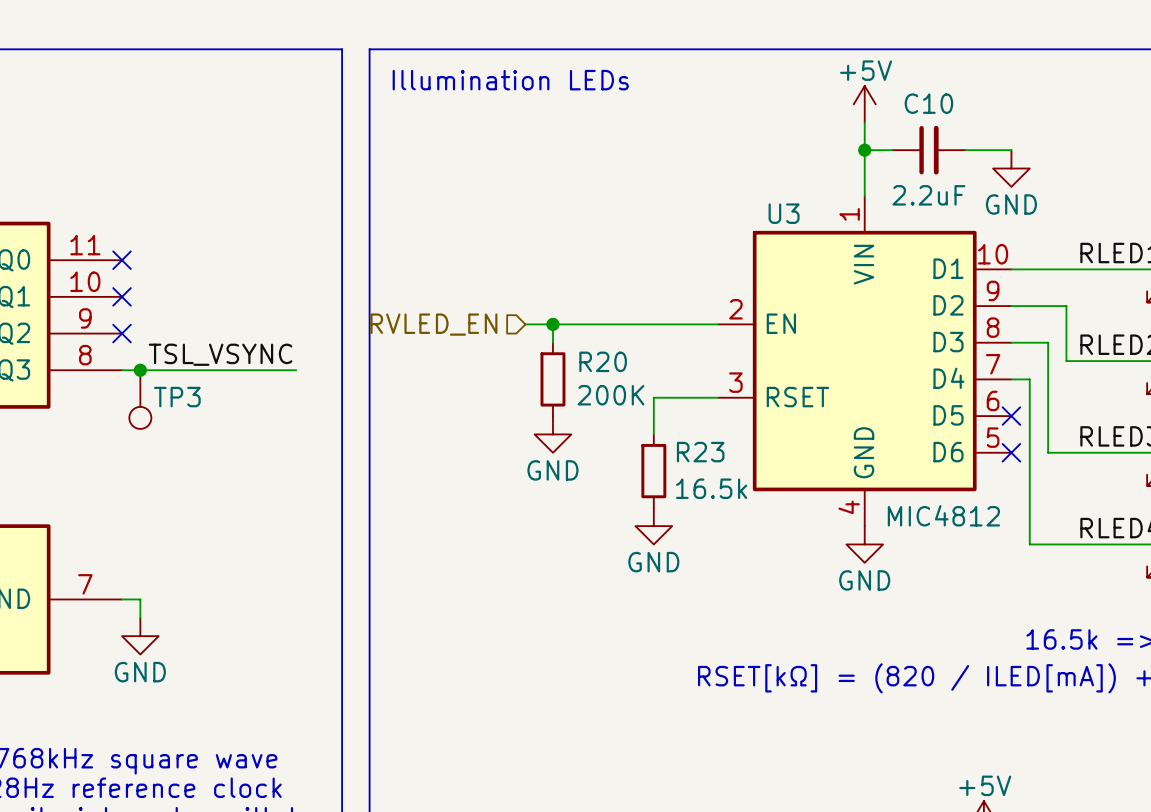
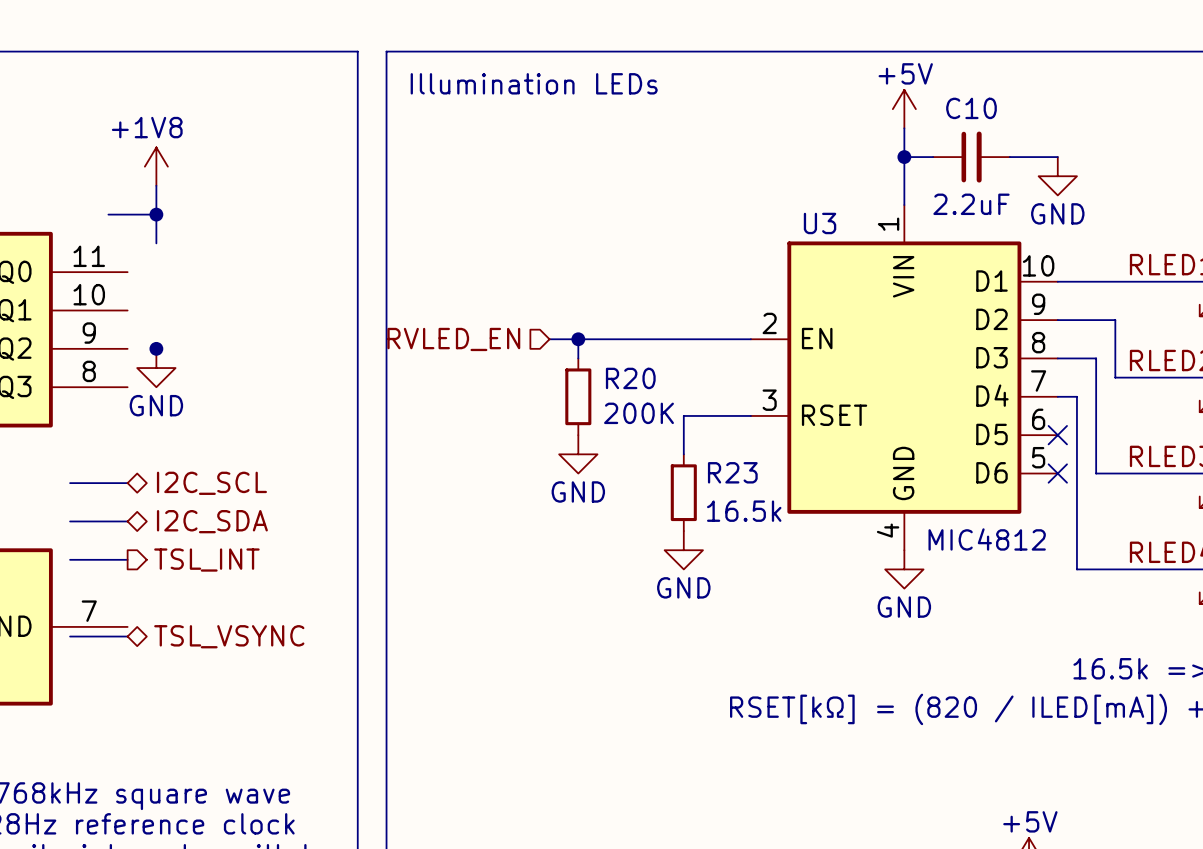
power symbol: none -> +1V8 (156, 166)
wire: none -> (156, 185) (156, 243)
wire: none -> (108, 214) (156, 214)
junction: none -> (156, 214)
no-connect mark: (122, 260) -> none
no-connect mark: (122, 296) -> none
no-connect mark: (122, 333) -> none
power symbol: none -> GND (156, 368)
label: TSL_VSYNC (220, 354) -> none
wire: (122, 370) (296, 370) -> none
junction position: (140, 370) -> (156, 348)
TP3: (140, 399) -> none
wire: none -> (70, 483) (127, 483)
hierarchical label: none -> I2C_SCL (211, 483)
wire: none -> (70, 521) (127, 521)
hierarchical label: none -> I2C_SDA (212, 521)
wire: none -> (70, 559) (127, 559)
hierarchical label: none -> TSL_INT (206, 560)
wire: (122, 599) (140, 599) (140, 617) -> none
wire: none -> (70, 636) (127, 636)
hierarchical label: none -> TSL_VSYNC (229, 636)
power symbol: GND (140, 636) -> none

